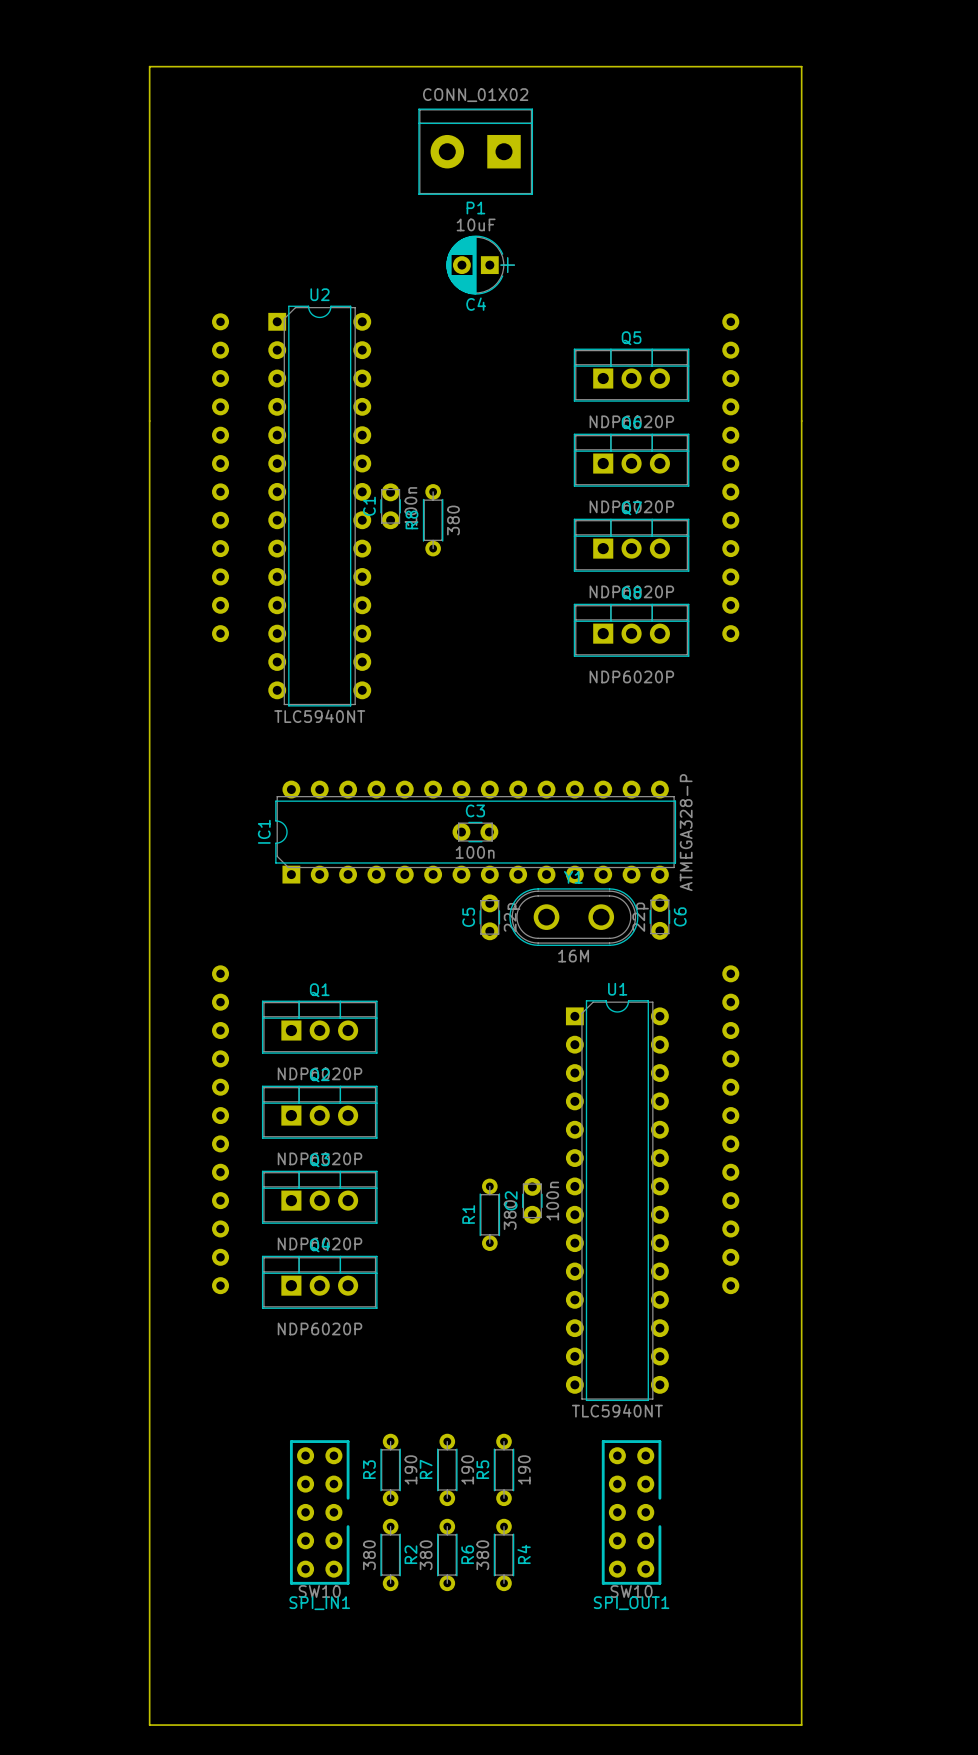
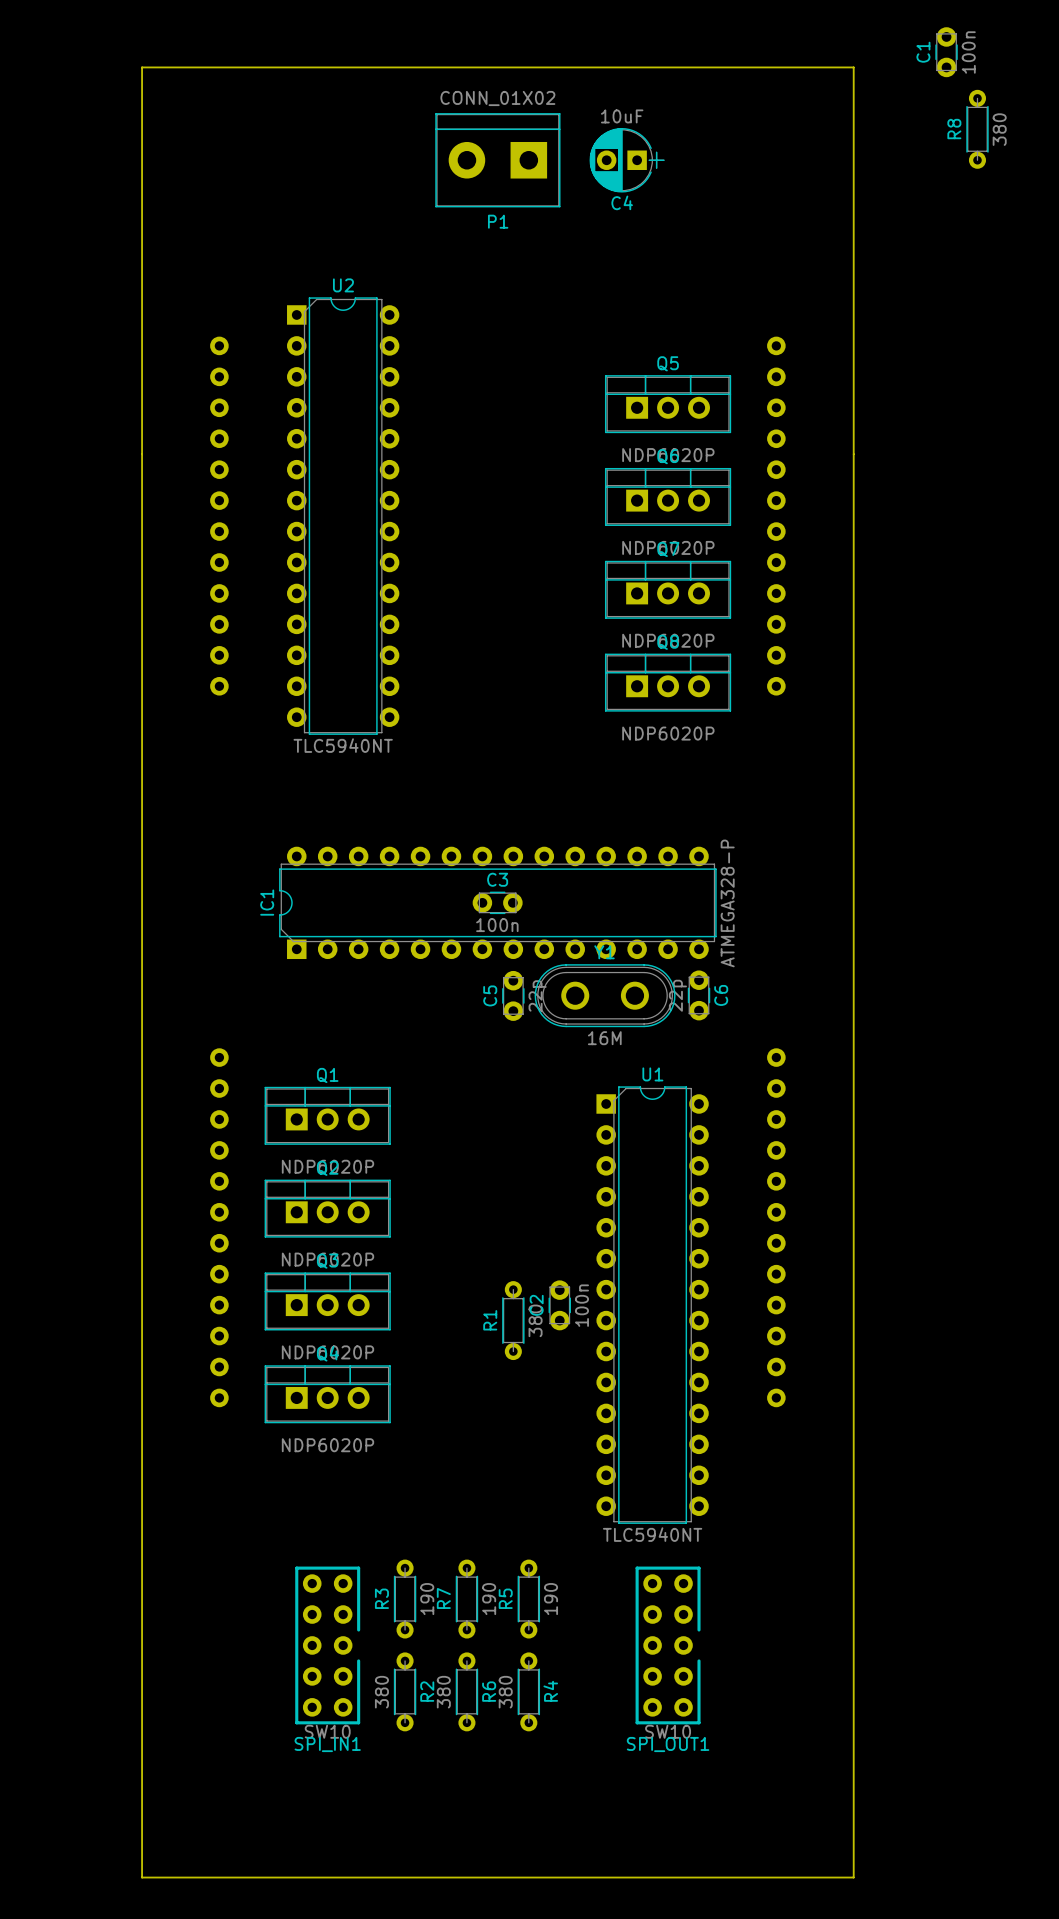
C4 position: (480, 265) -> (627, 160)
U2 position: (319, 506) -> (343, 516)
C1 position: (390, 506) -> (946, 52)
R8 position: (433, 520) -> (977, 129)

